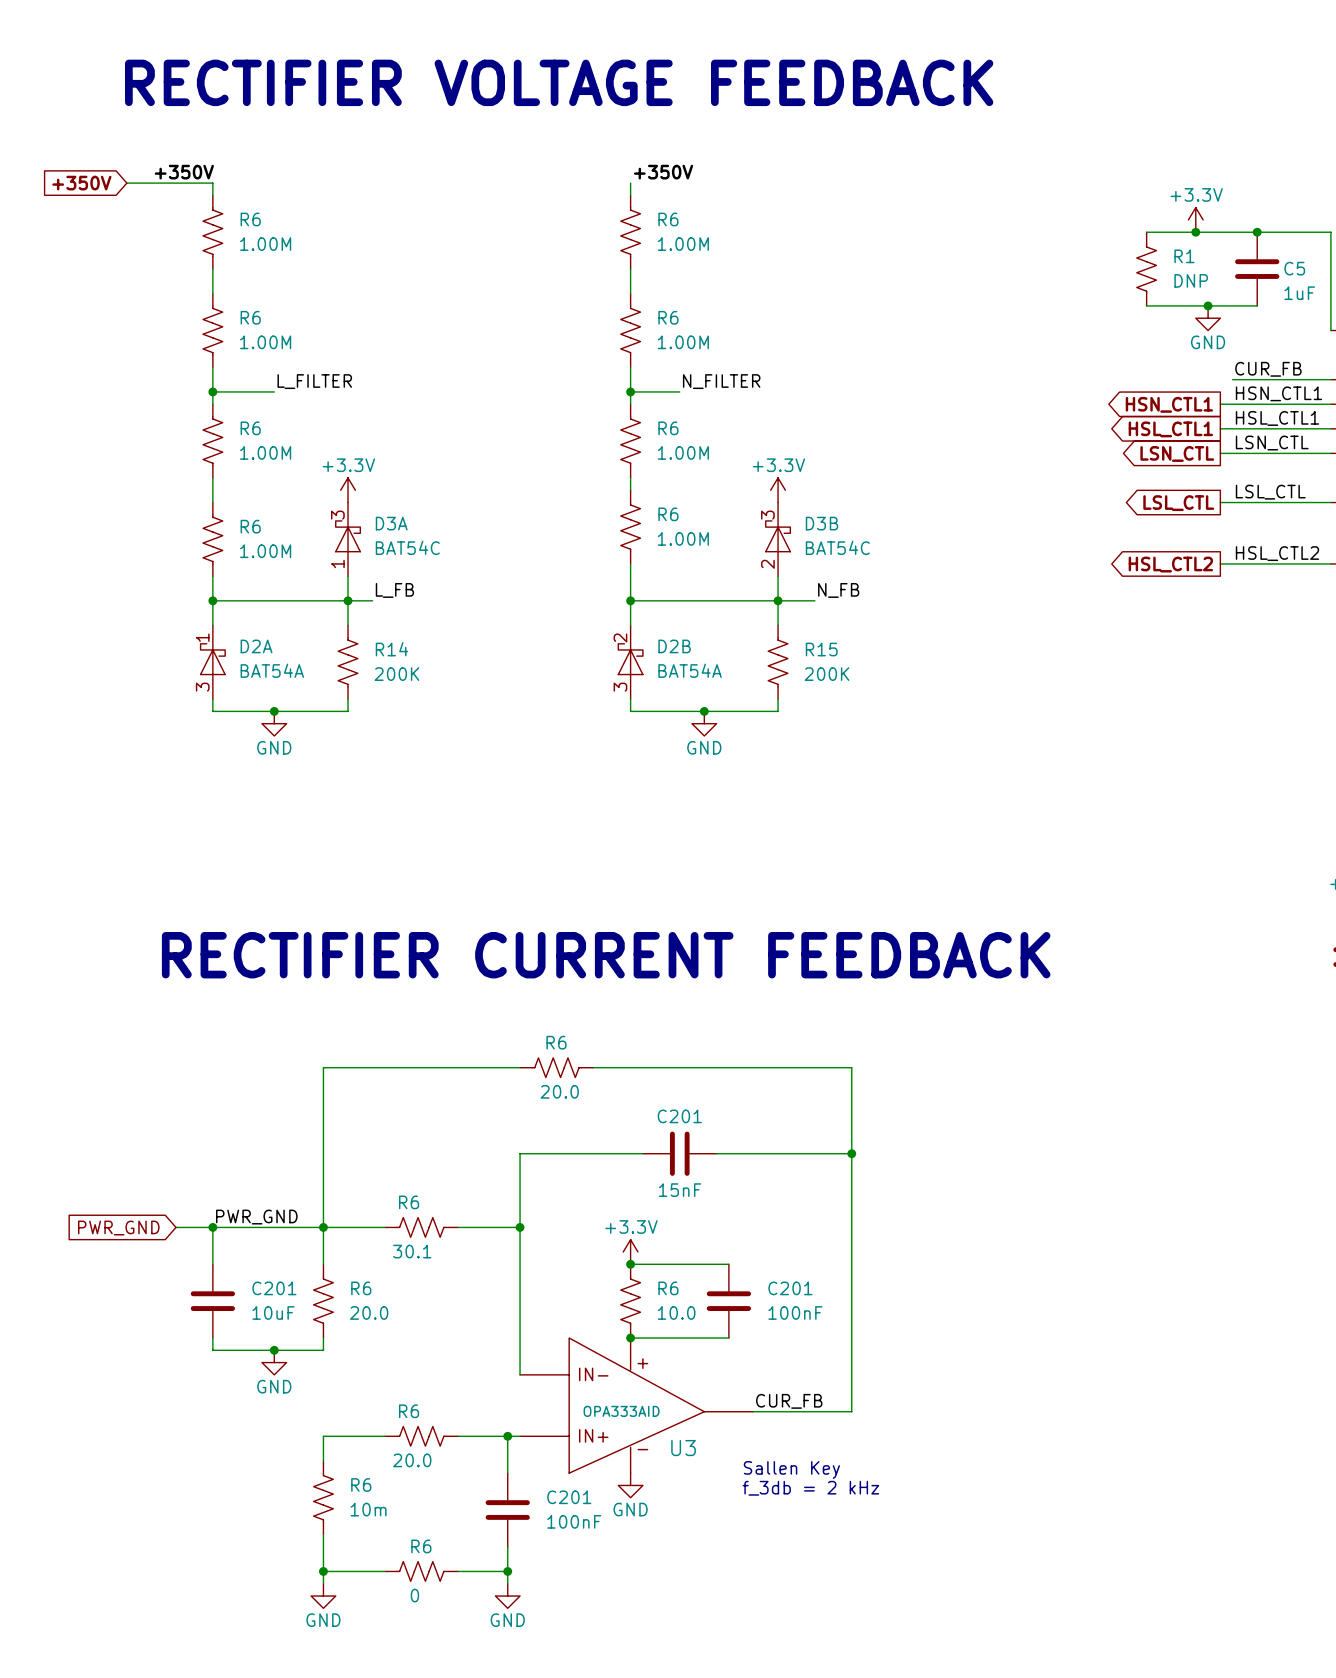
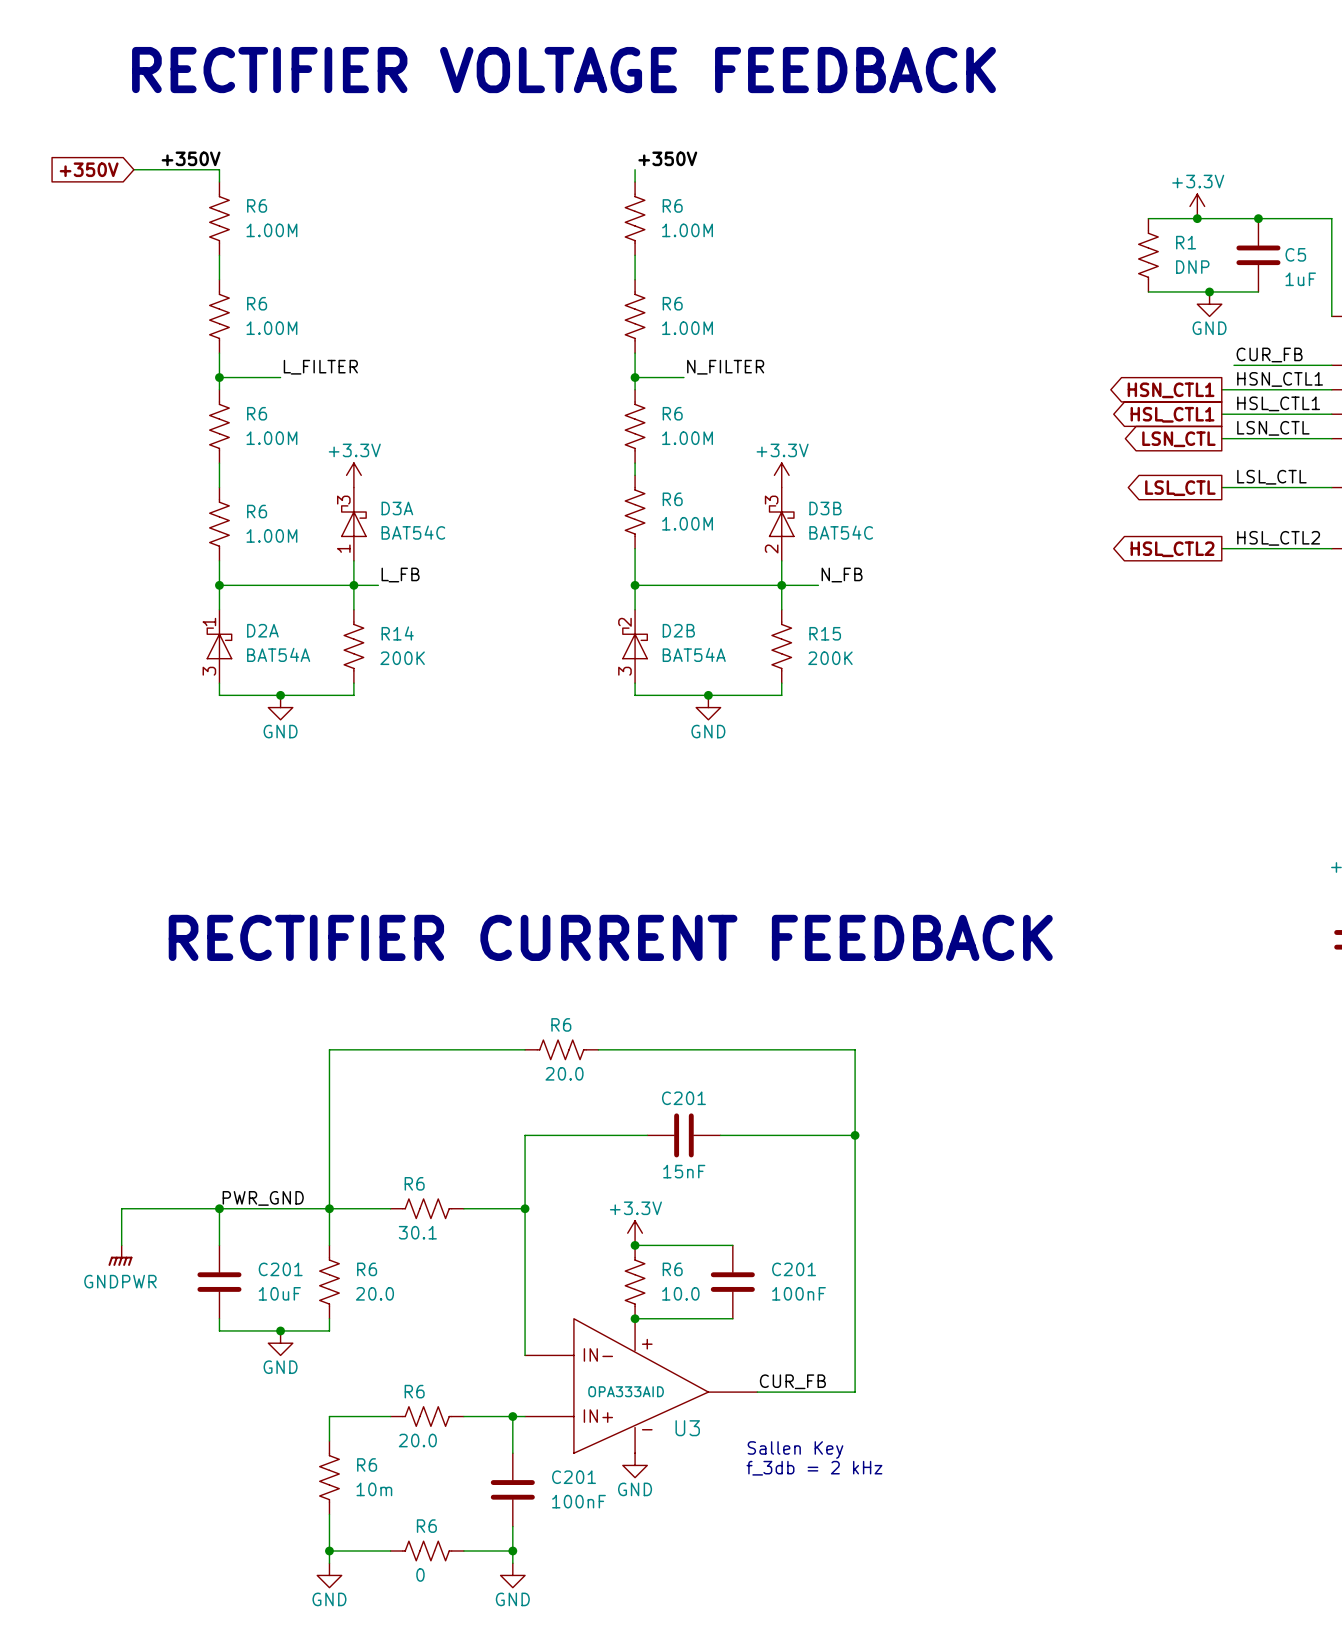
wire: none -> (182, 1208) (121, 1208) (121, 1245)
global label: PWR_GND (118, 1228) -> none
power symbol: none -> GNDPWR (120, 1255)

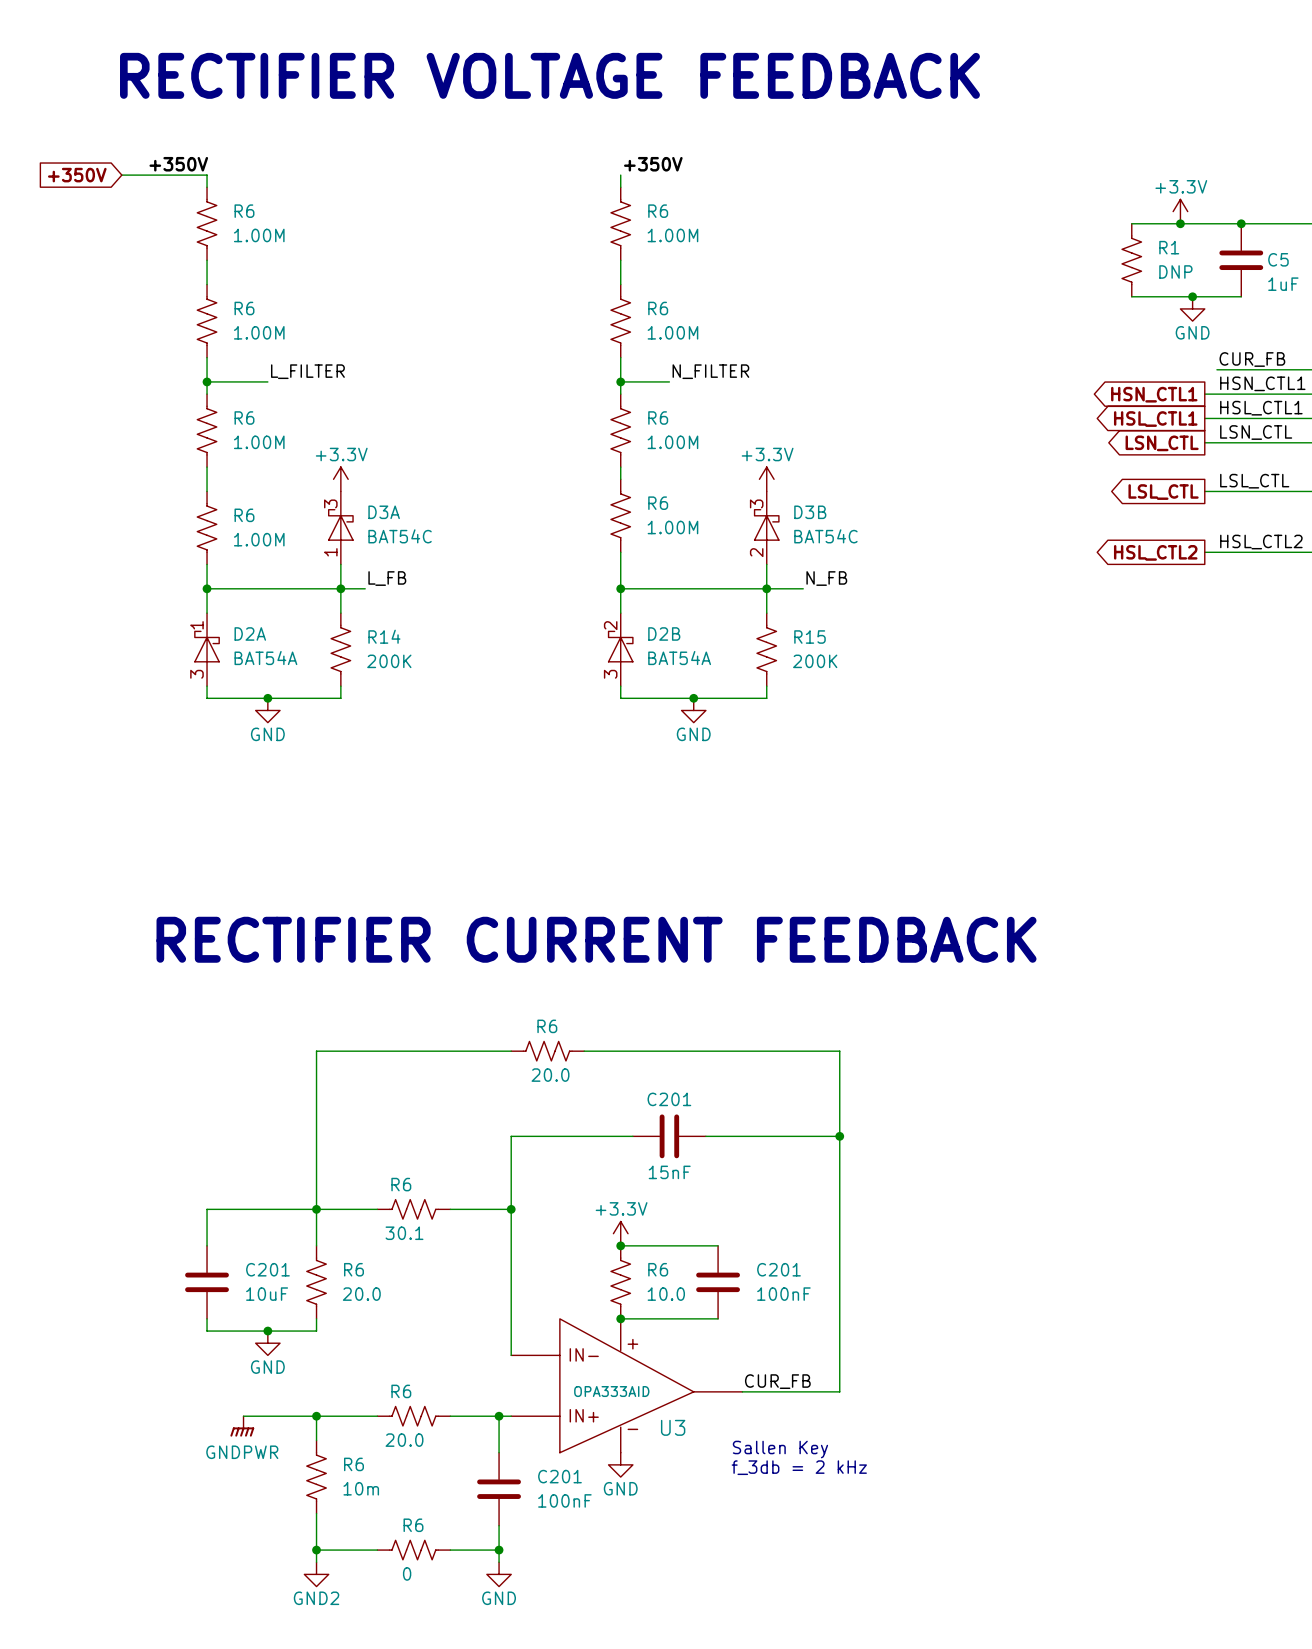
label: PWR_GND (263, 1198) -> none
wire: (219, 1208) (121, 1208) (121, 1245) -> none
junction: (219, 1208) -> none
power symbol position: GNDPWR (120, 1255) -> GNDPWR (242, 1426)
wire: none -> (243, 1416) (316, 1416)
junction: none -> (316, 1416)
power symbol: GND (329, 1575) -> GND2 (316, 1574)

